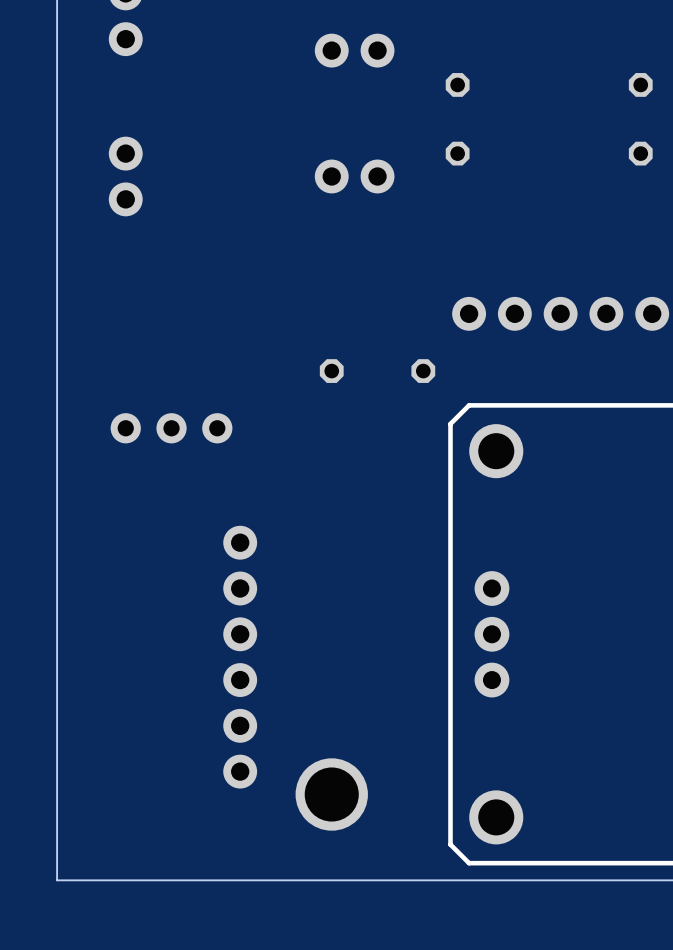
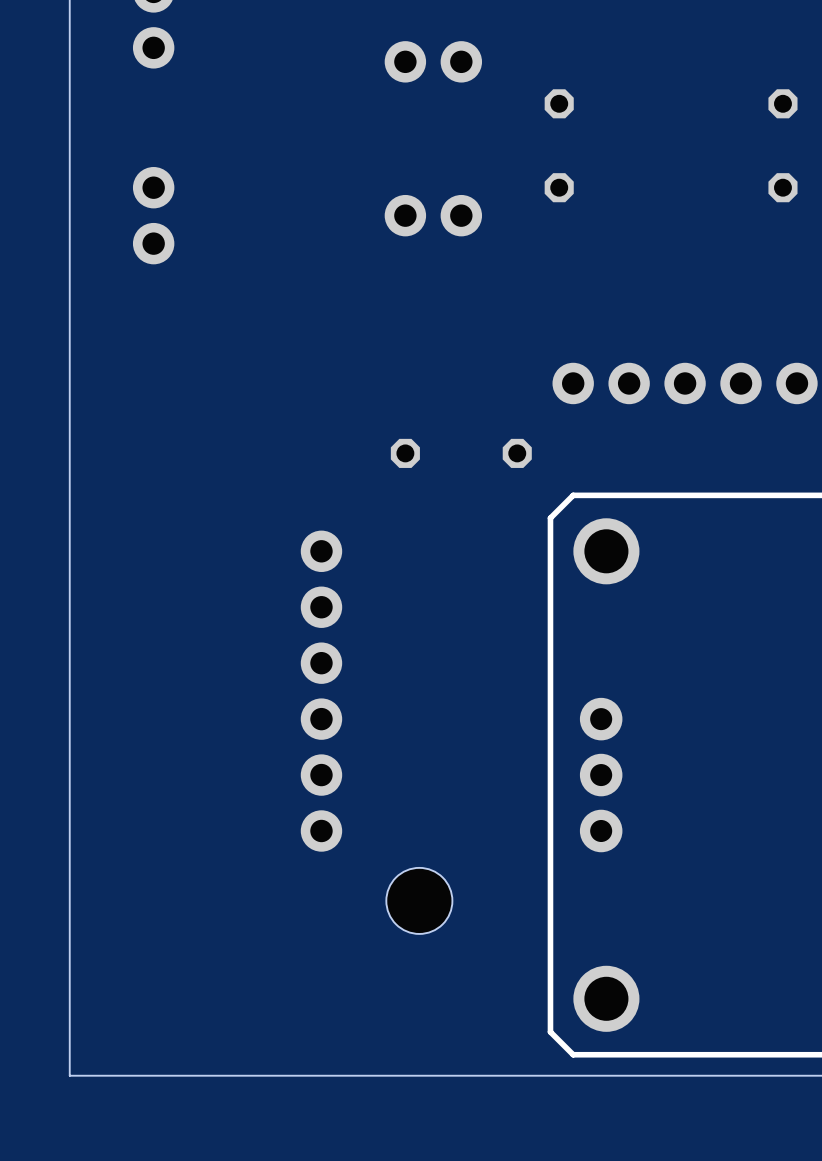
part: (171, 428) -> none
part position: (240, 657) -> (321, 691)
part: none -> (419, 900)
part: (331, 794) -> none

